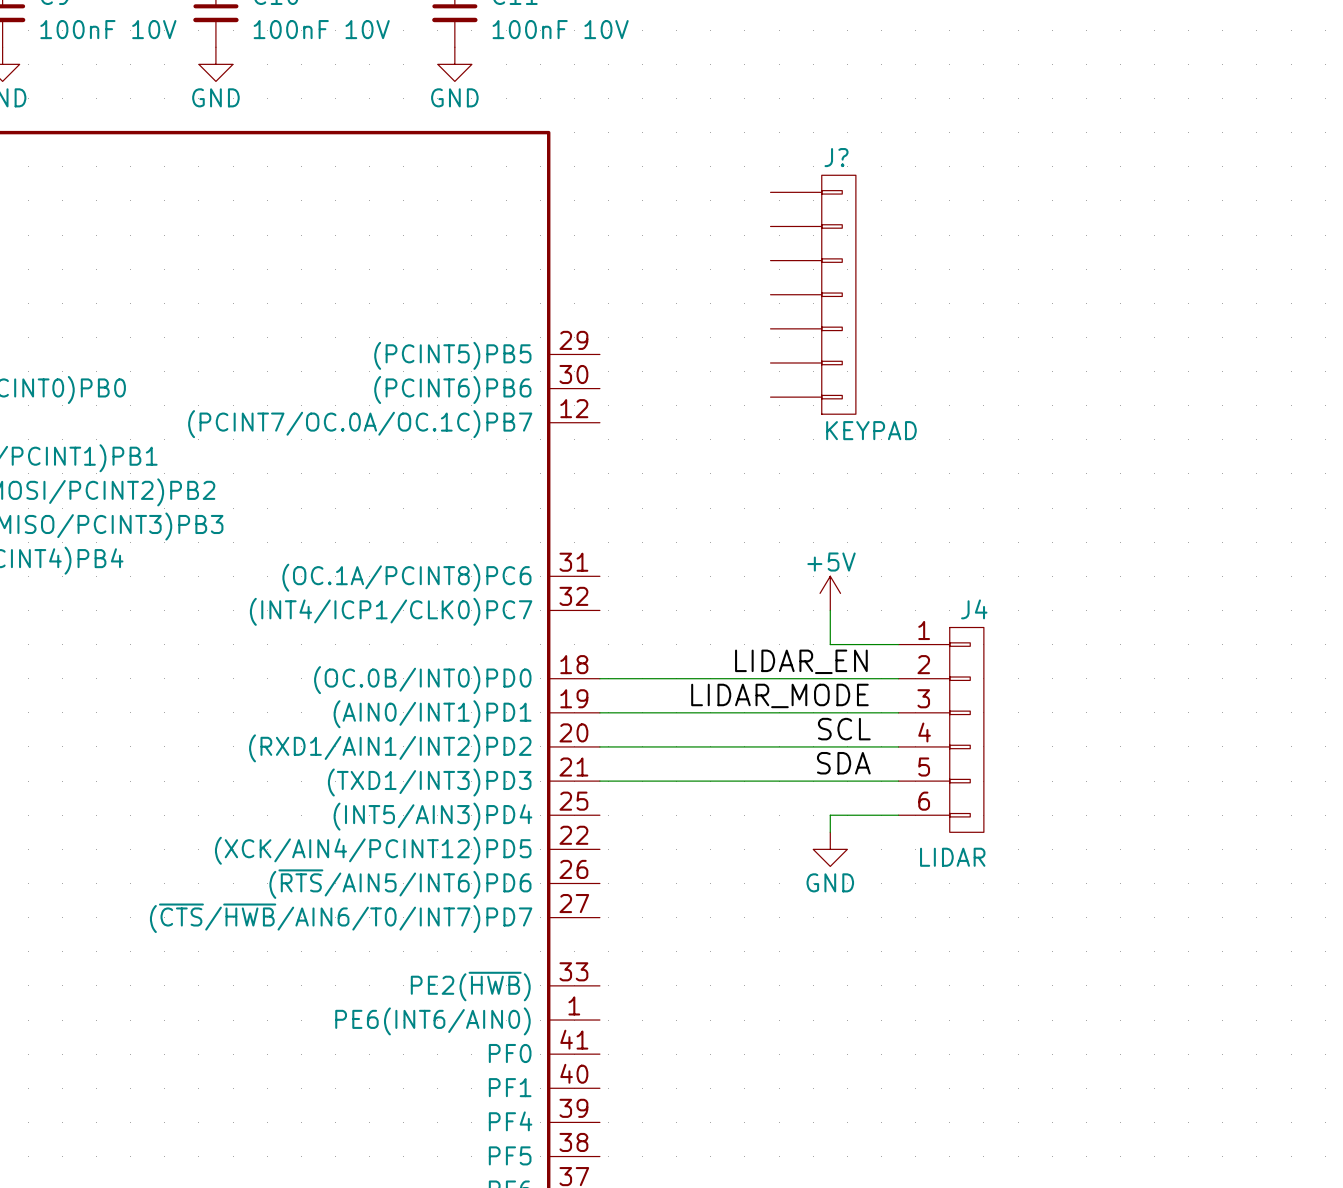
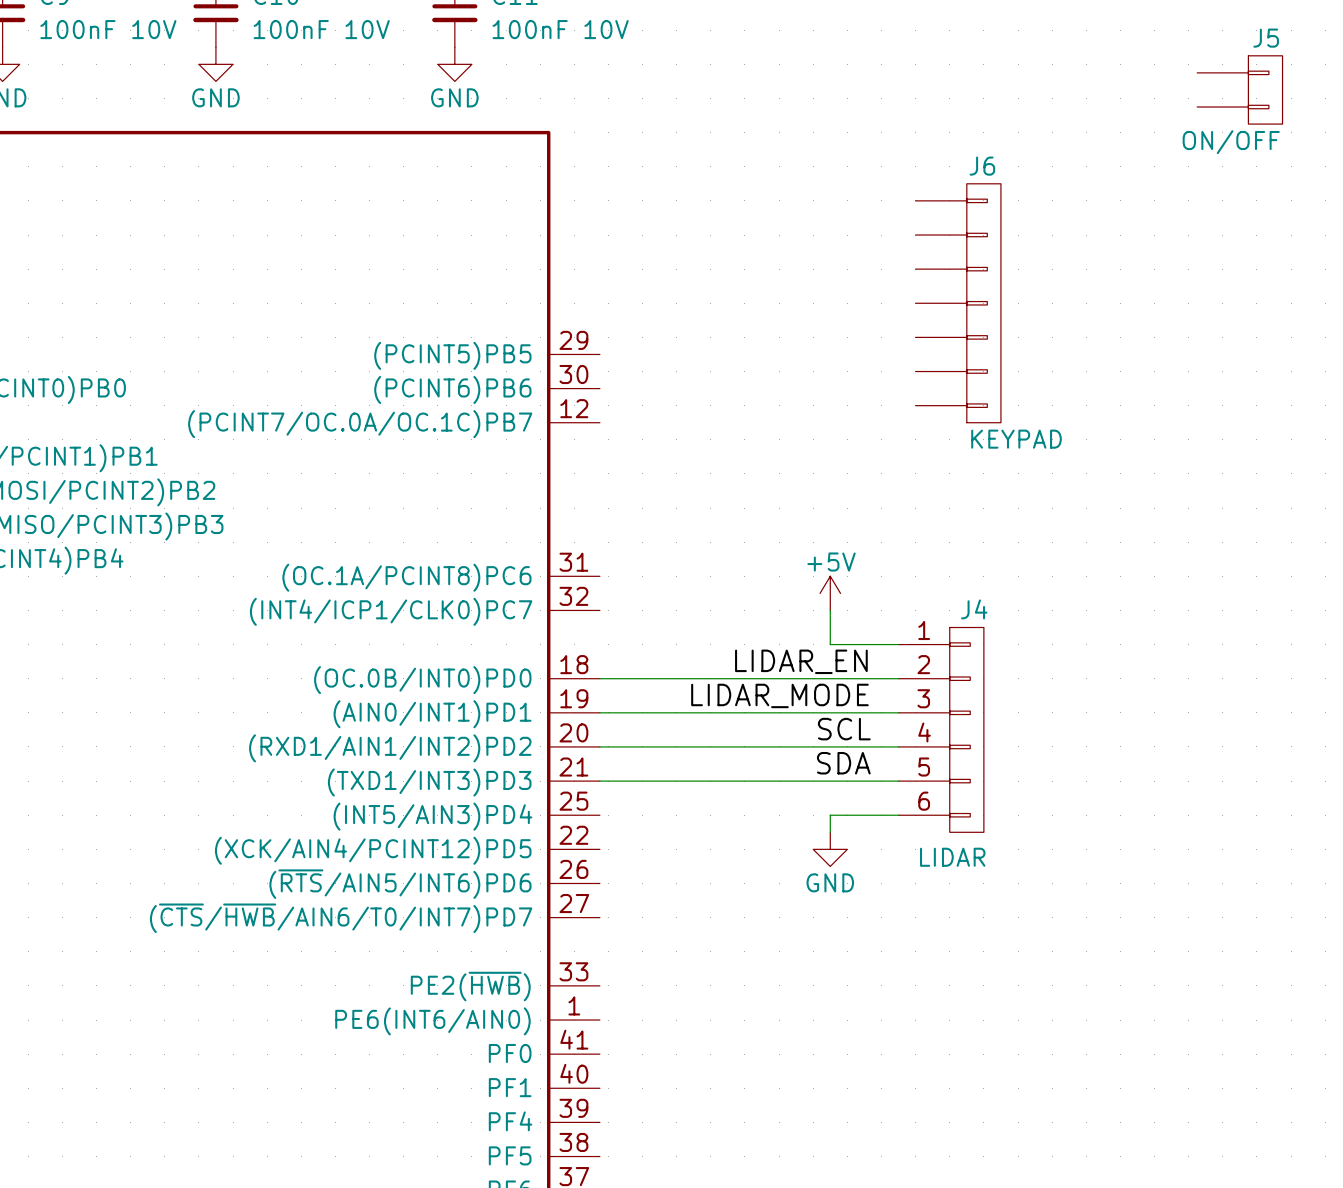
J5: none -> ON/OFF (1239, 89)
J?: KEYPAD (813, 294) -> none
J6: none -> KEYPAD (958, 303)

